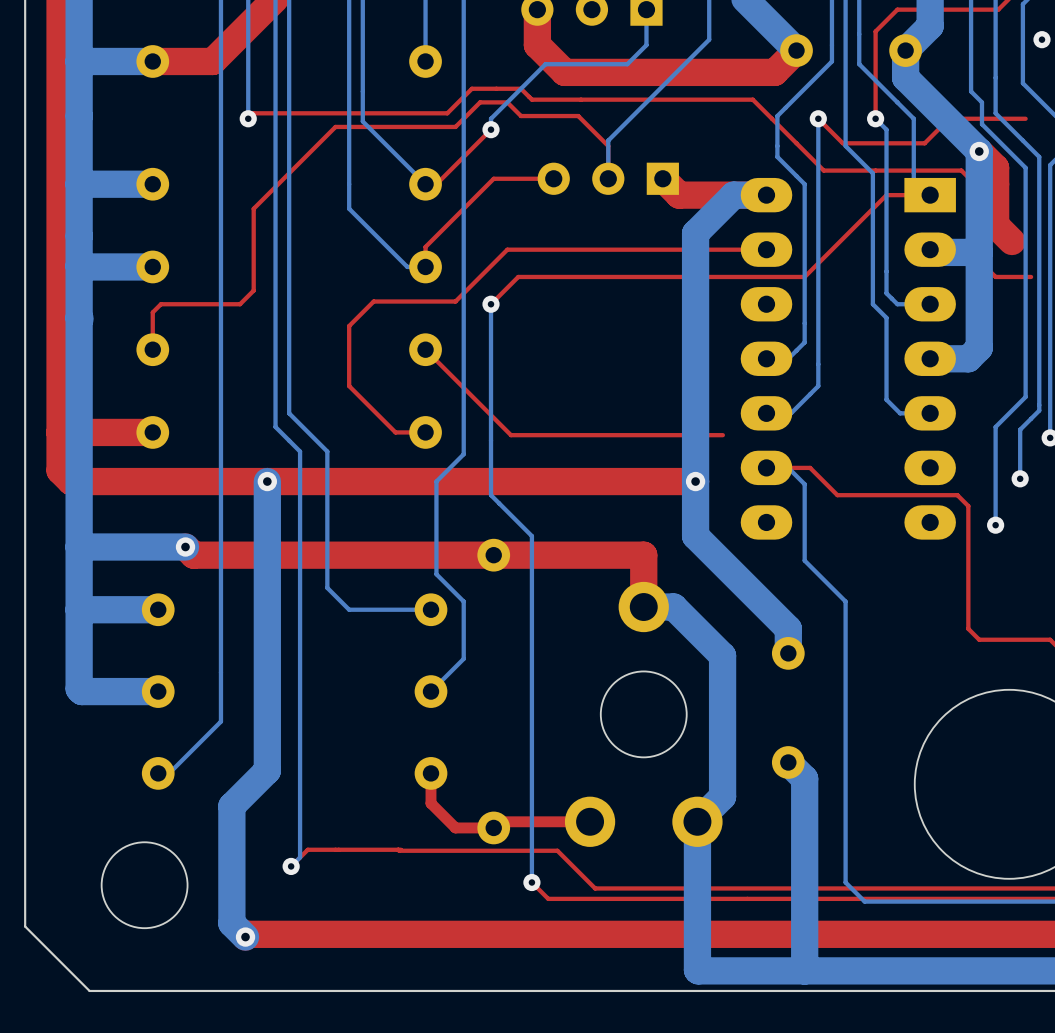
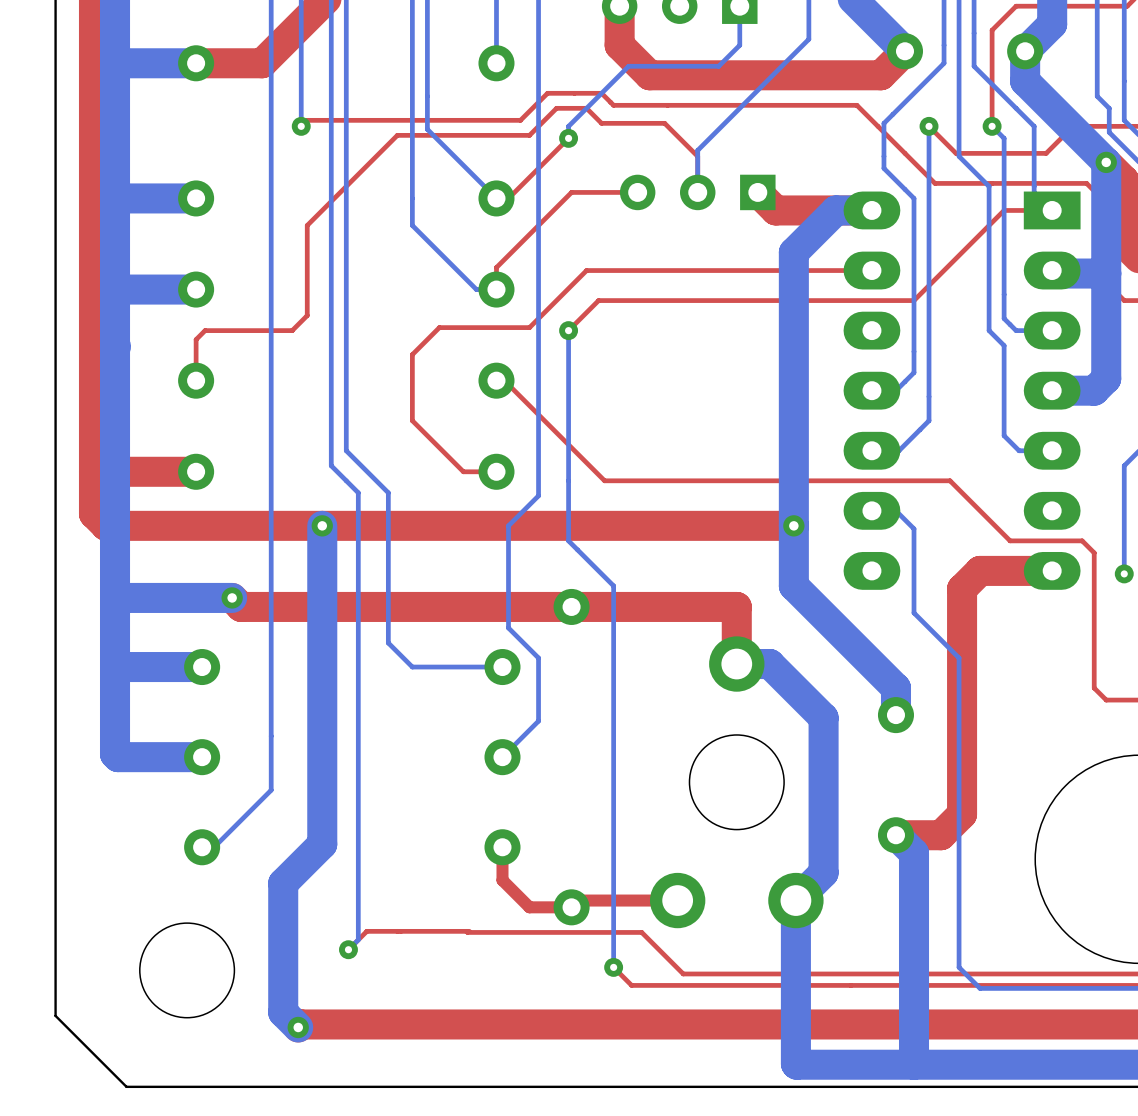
top track: (425, 349) (511, 435) (722, 435) -> (496, 380) (504, 380) (604, 480) (950, 480) (1010, 540)
top track: (766, 467) (810, 467) (837, 495) (891, 495) -> none
top track: none -> (1052, 570) (980, 570) (962, 588) (962, 814) (941, 835) (895, 835)

